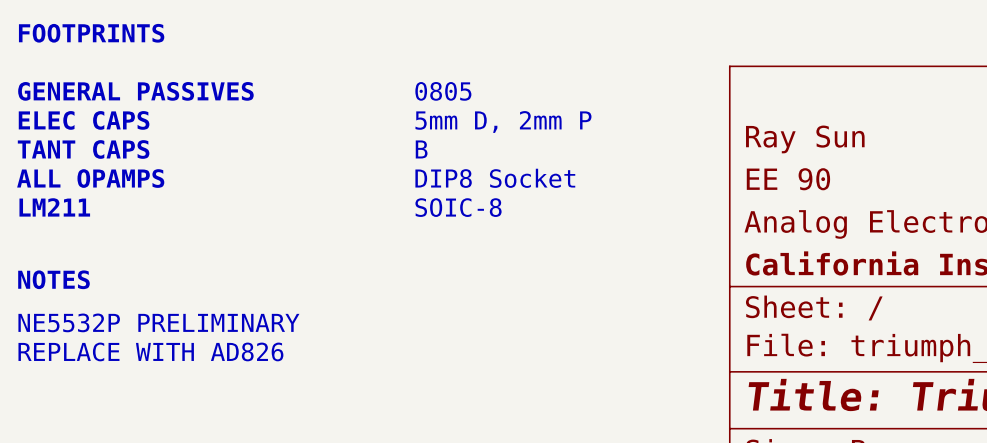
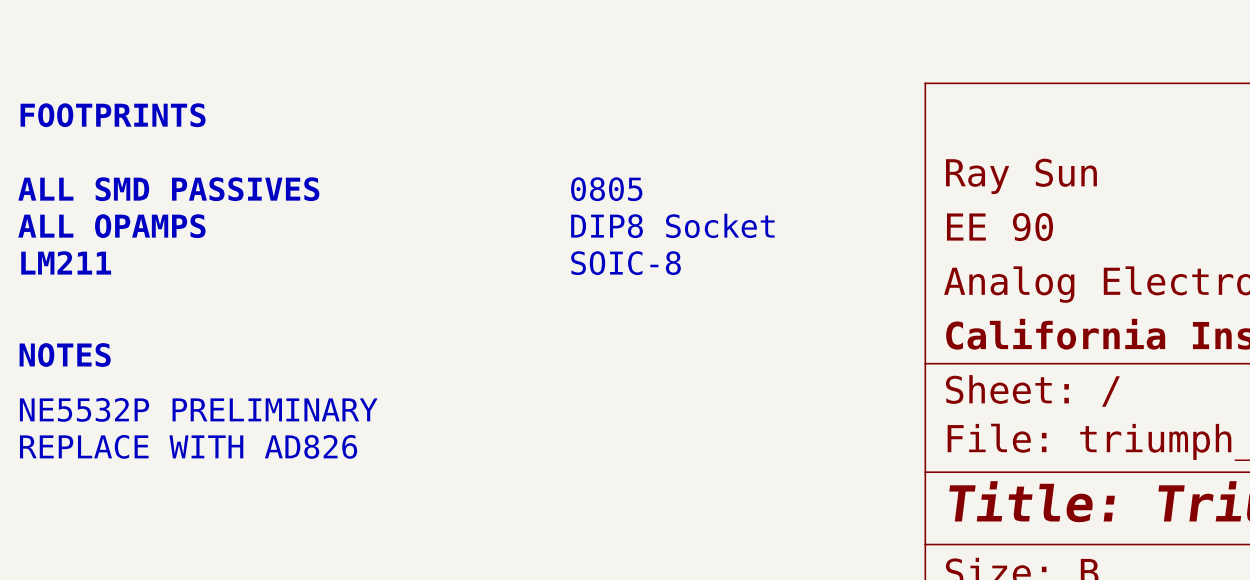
text: FOOTPRINTS (91, 33) -> none
text: GENERAL PASSIVES (135, 91) -> FOOTPRINTS (113, 115)
text position: 0805 (443, 91) -> 0805 (606, 189)
text: ELEC CAPS (84, 120) -> none
text: 5mm D, 2mm P (503, 121) -> none
text: TANT CAPS (83, 149) -> ALL SMD PASSIVES (168, 189)
text: B (421, 149) -> none
text position: DIP8 Socket (495, 178) -> DIP8 Socket (672, 225)
text position: SOIC-8 (458, 207) -> SOIC-8 (625, 263)

